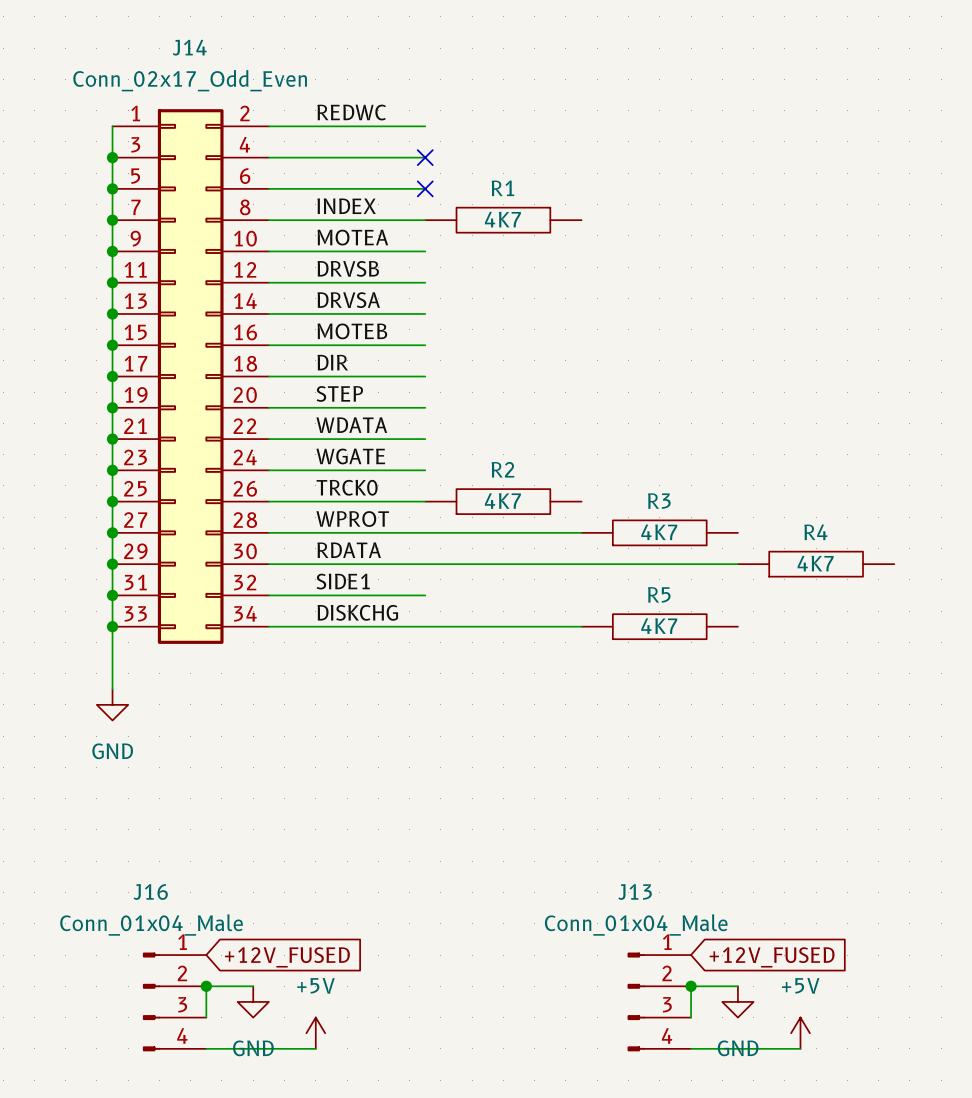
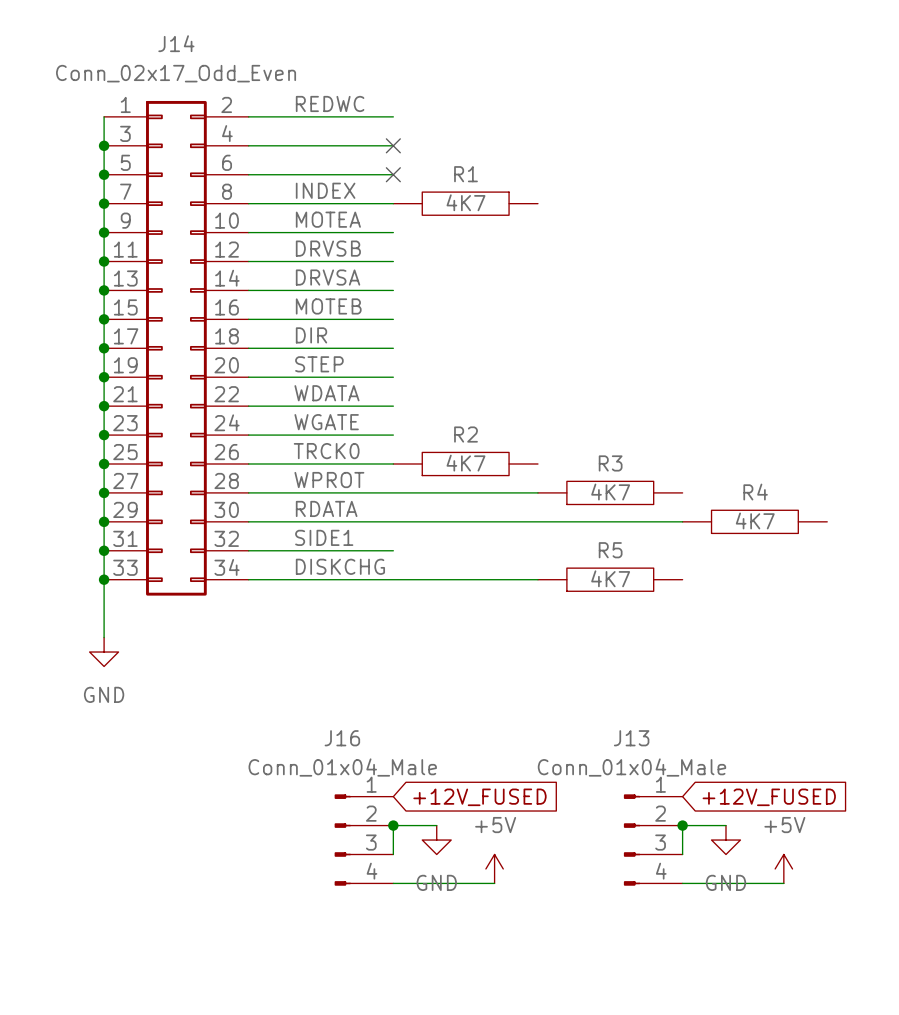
global label: none -> +12V_FUSED (479, 797)
junction: none -> (393, 825)
junction: none -> (682, 825)
power symbol: none -> GND (436, 840)
power symbol: none -> +5V (494, 868)
global label: +12V_FUSED (287, 957) -> none
global label position: +12V_FUSED (772, 957) -> +12V_FUSED (769, 797)
junction: (206, 986) -> none
wire: (253, 986) (206, 986) (206, 1017) -> (436, 825) (393, 825) (393, 854)
junction: (691, 986) -> none
wire: (737, 986) (691, 986) (691, 1017) -> (725, 825) (682, 825) (682, 854)
J16 position: (174, 1001) -> (363, 840)
power symbol: GND (253, 1001) -> none
J13 position: (659, 1001) -> (653, 840)
power symbol position: GND (737, 1001) -> GND (725, 840)
power symbol: +5V (315, 1033) -> none
power symbol position: +5V (800, 1033) -> +5V (783, 868)
wire: (206, 1048) (315, 1048) -> (393, 883) (494, 883)
wire: (691, 1048) (800, 1048) -> (682, 883) (783, 883)

